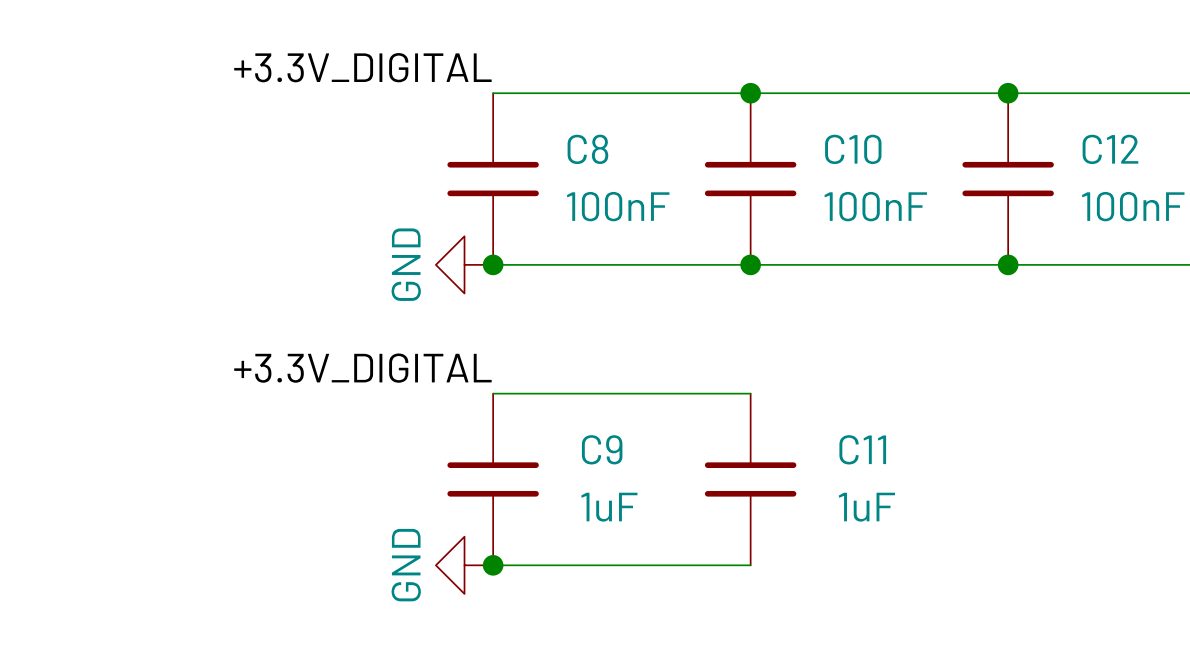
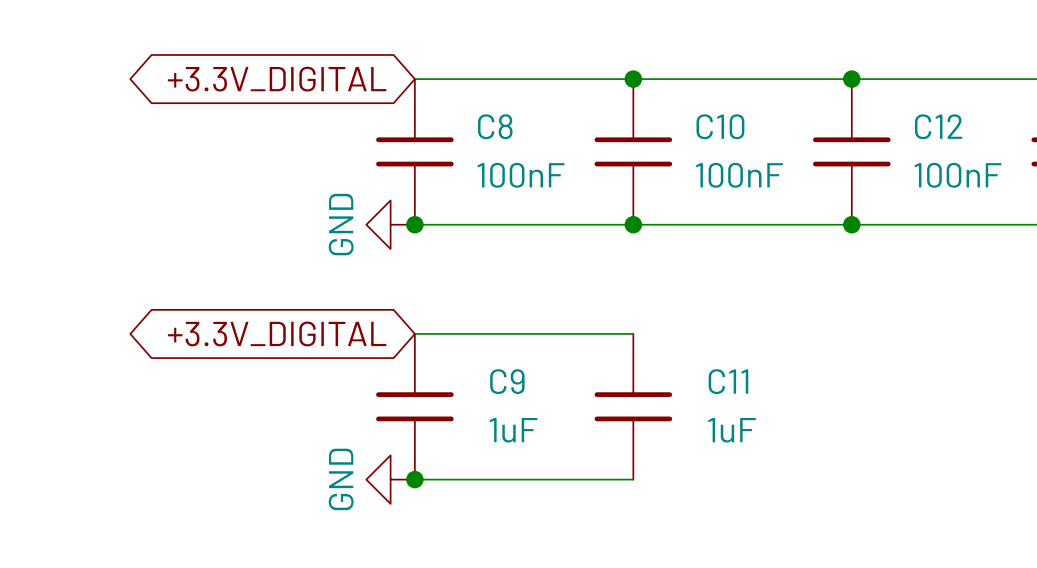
label: +3.3V_DIGITAL (362, 67) -> none
global label: none -> +3.3V_DIGITAL (277, 79)
label: +3.3V_DIGITAL (362, 368) -> none
global label: none -> +3.3V_DIGITAL (277, 333)

